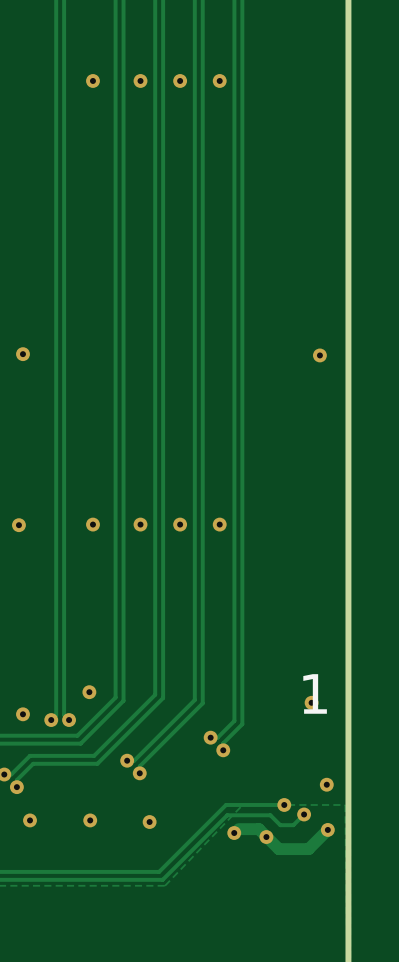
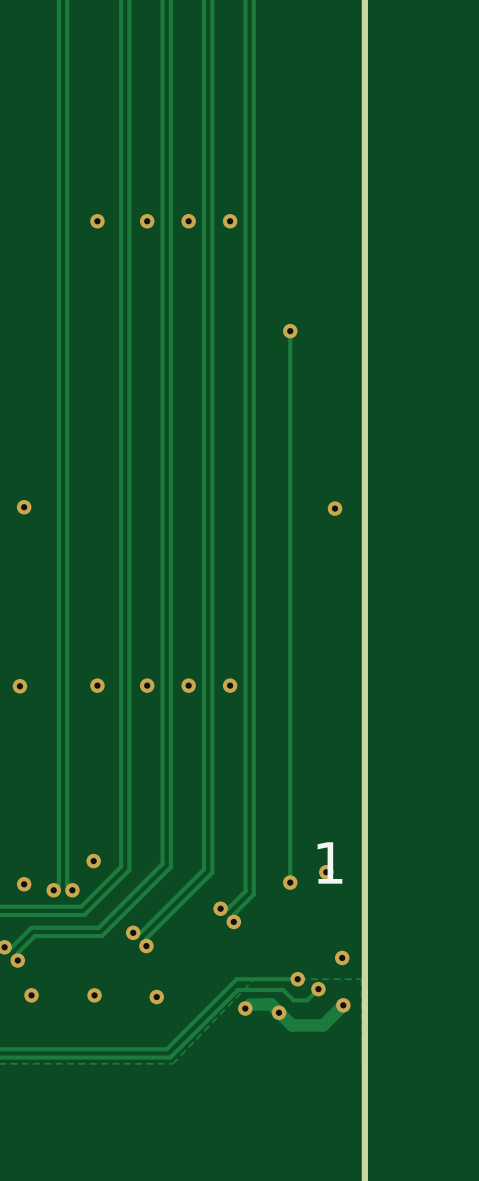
track: none -> (290, 331) (290, 882)
via: none -> (290, 331)
via: none -> (290, 882)

